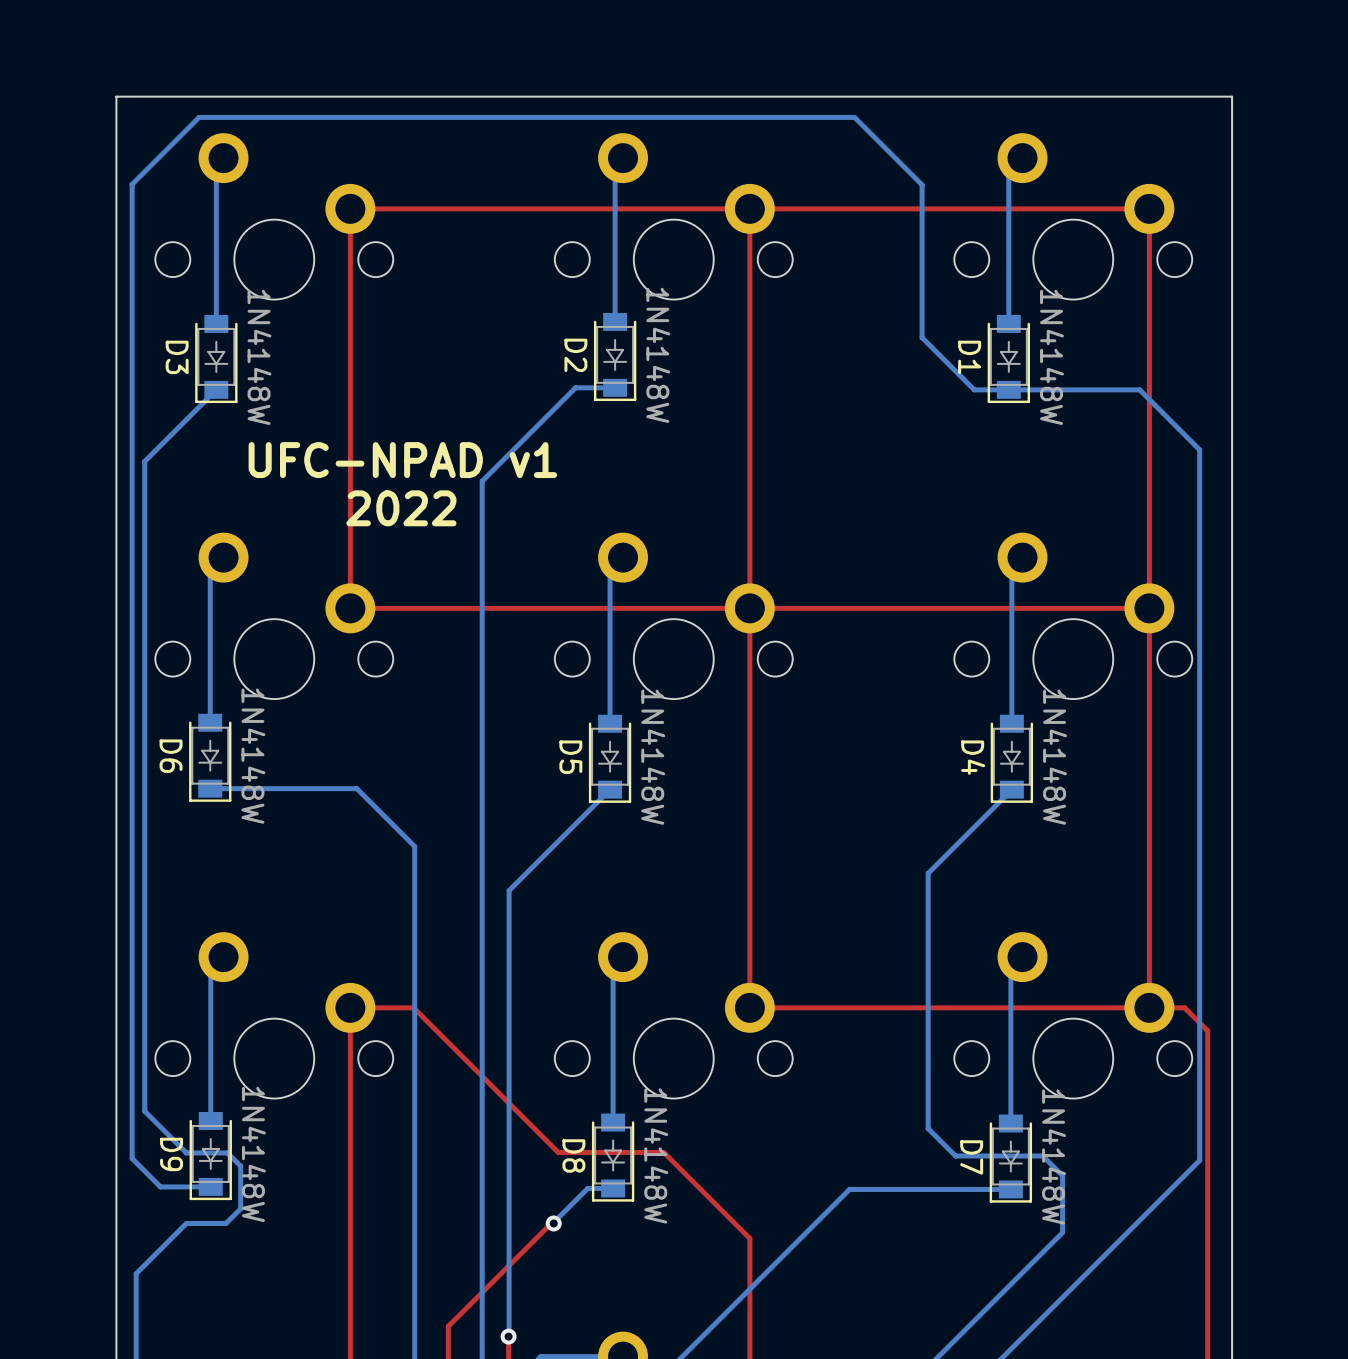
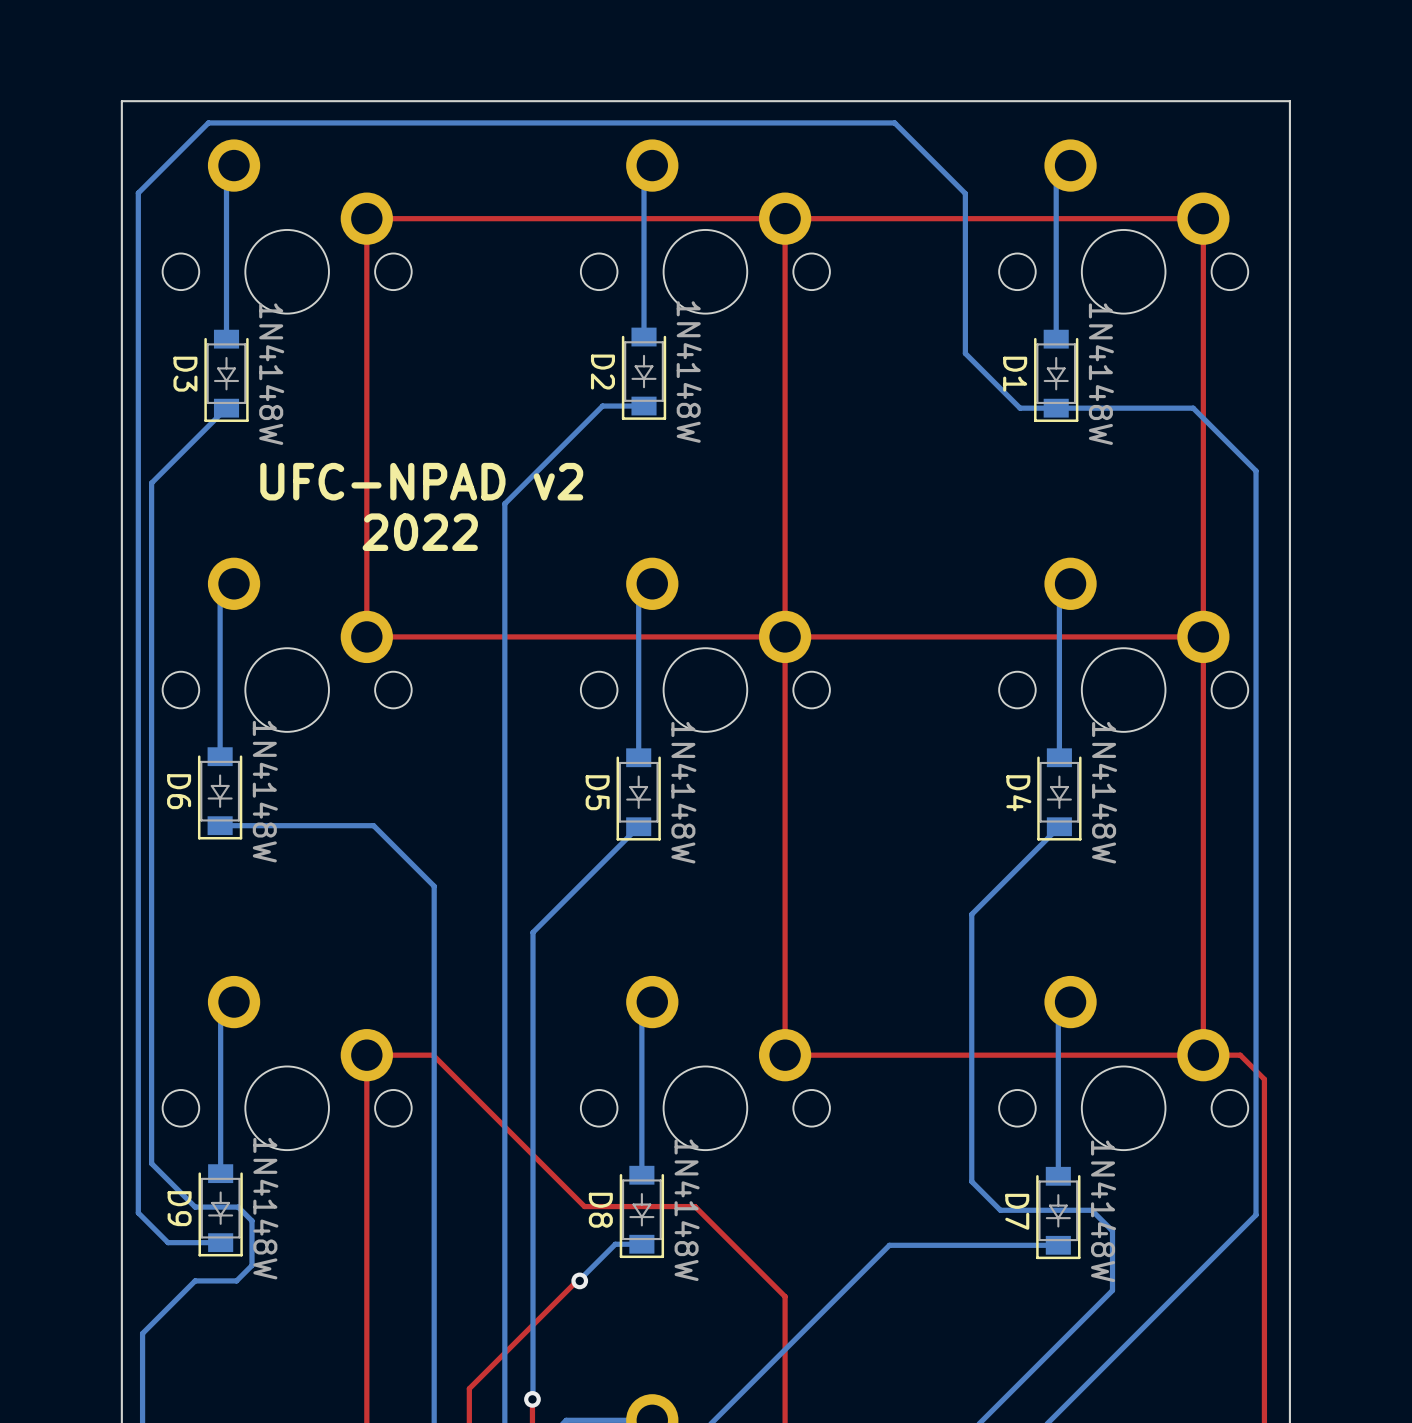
text: UFC-NPAD v1 (402, 460) -> UFC-NPAD v2 (421, 481)

